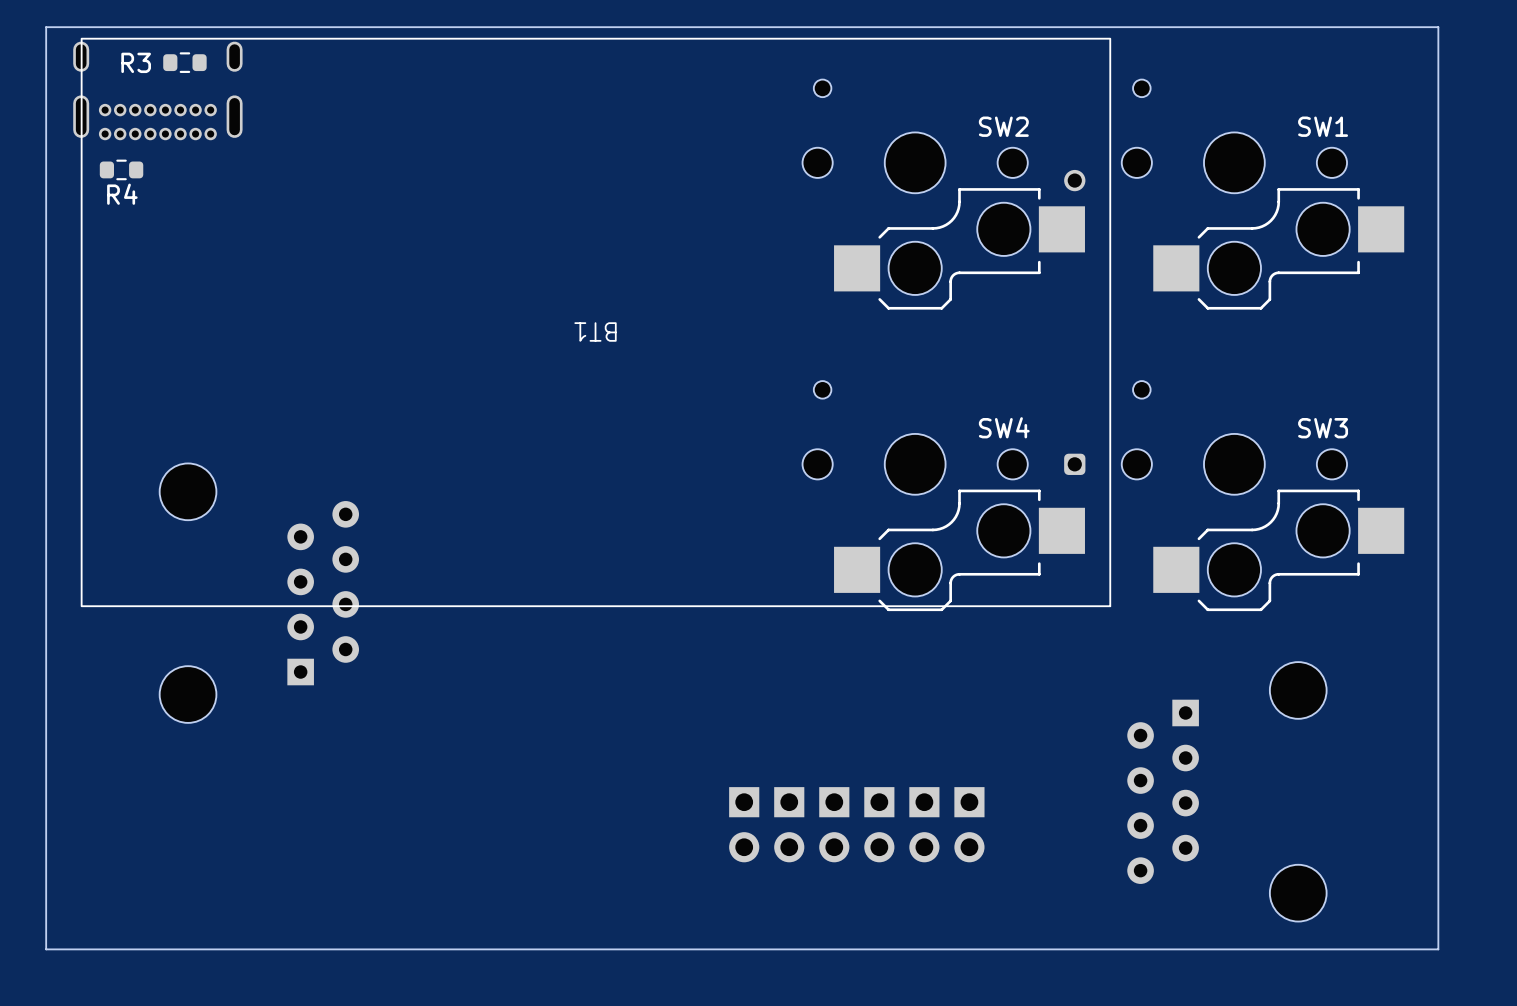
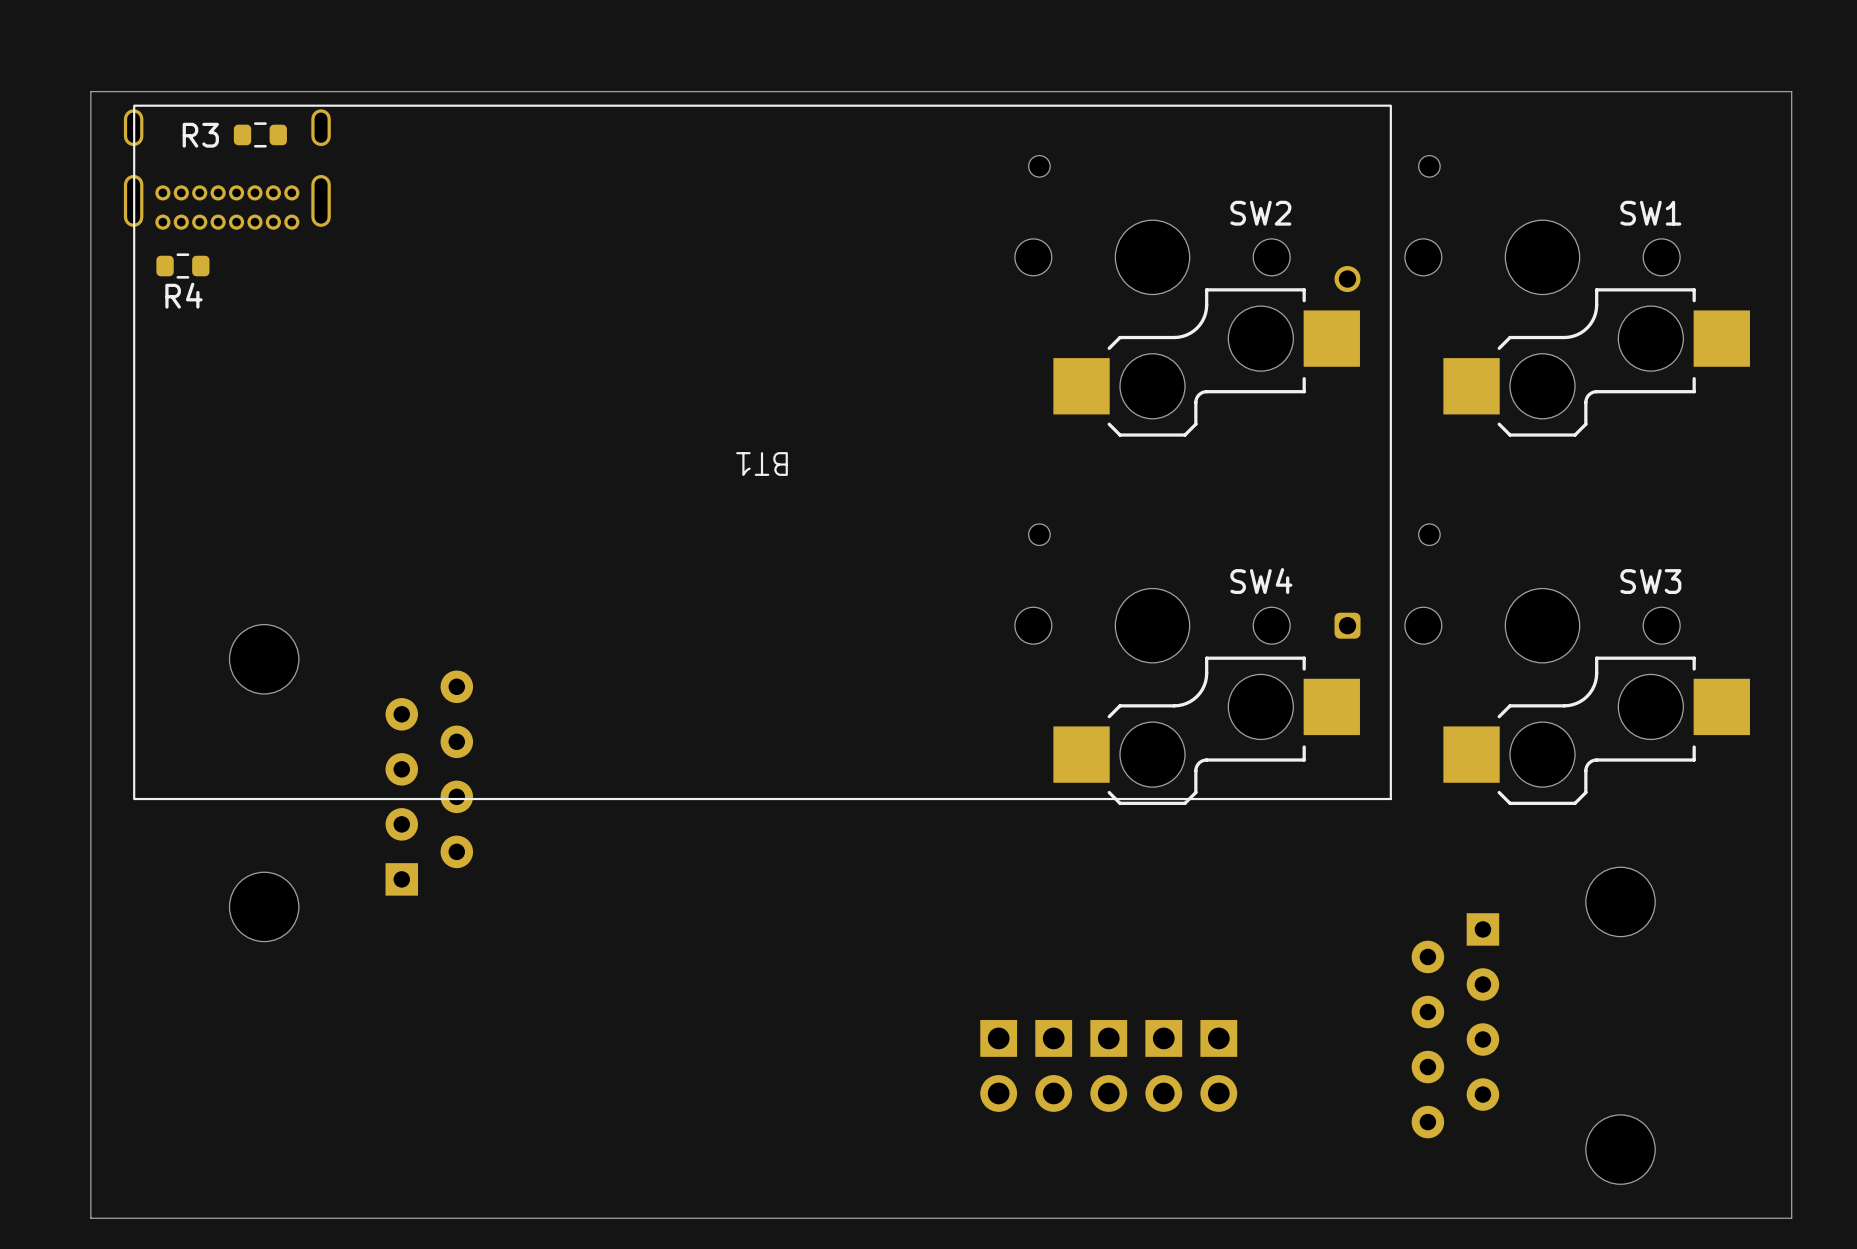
part: (744, 824) -> none

